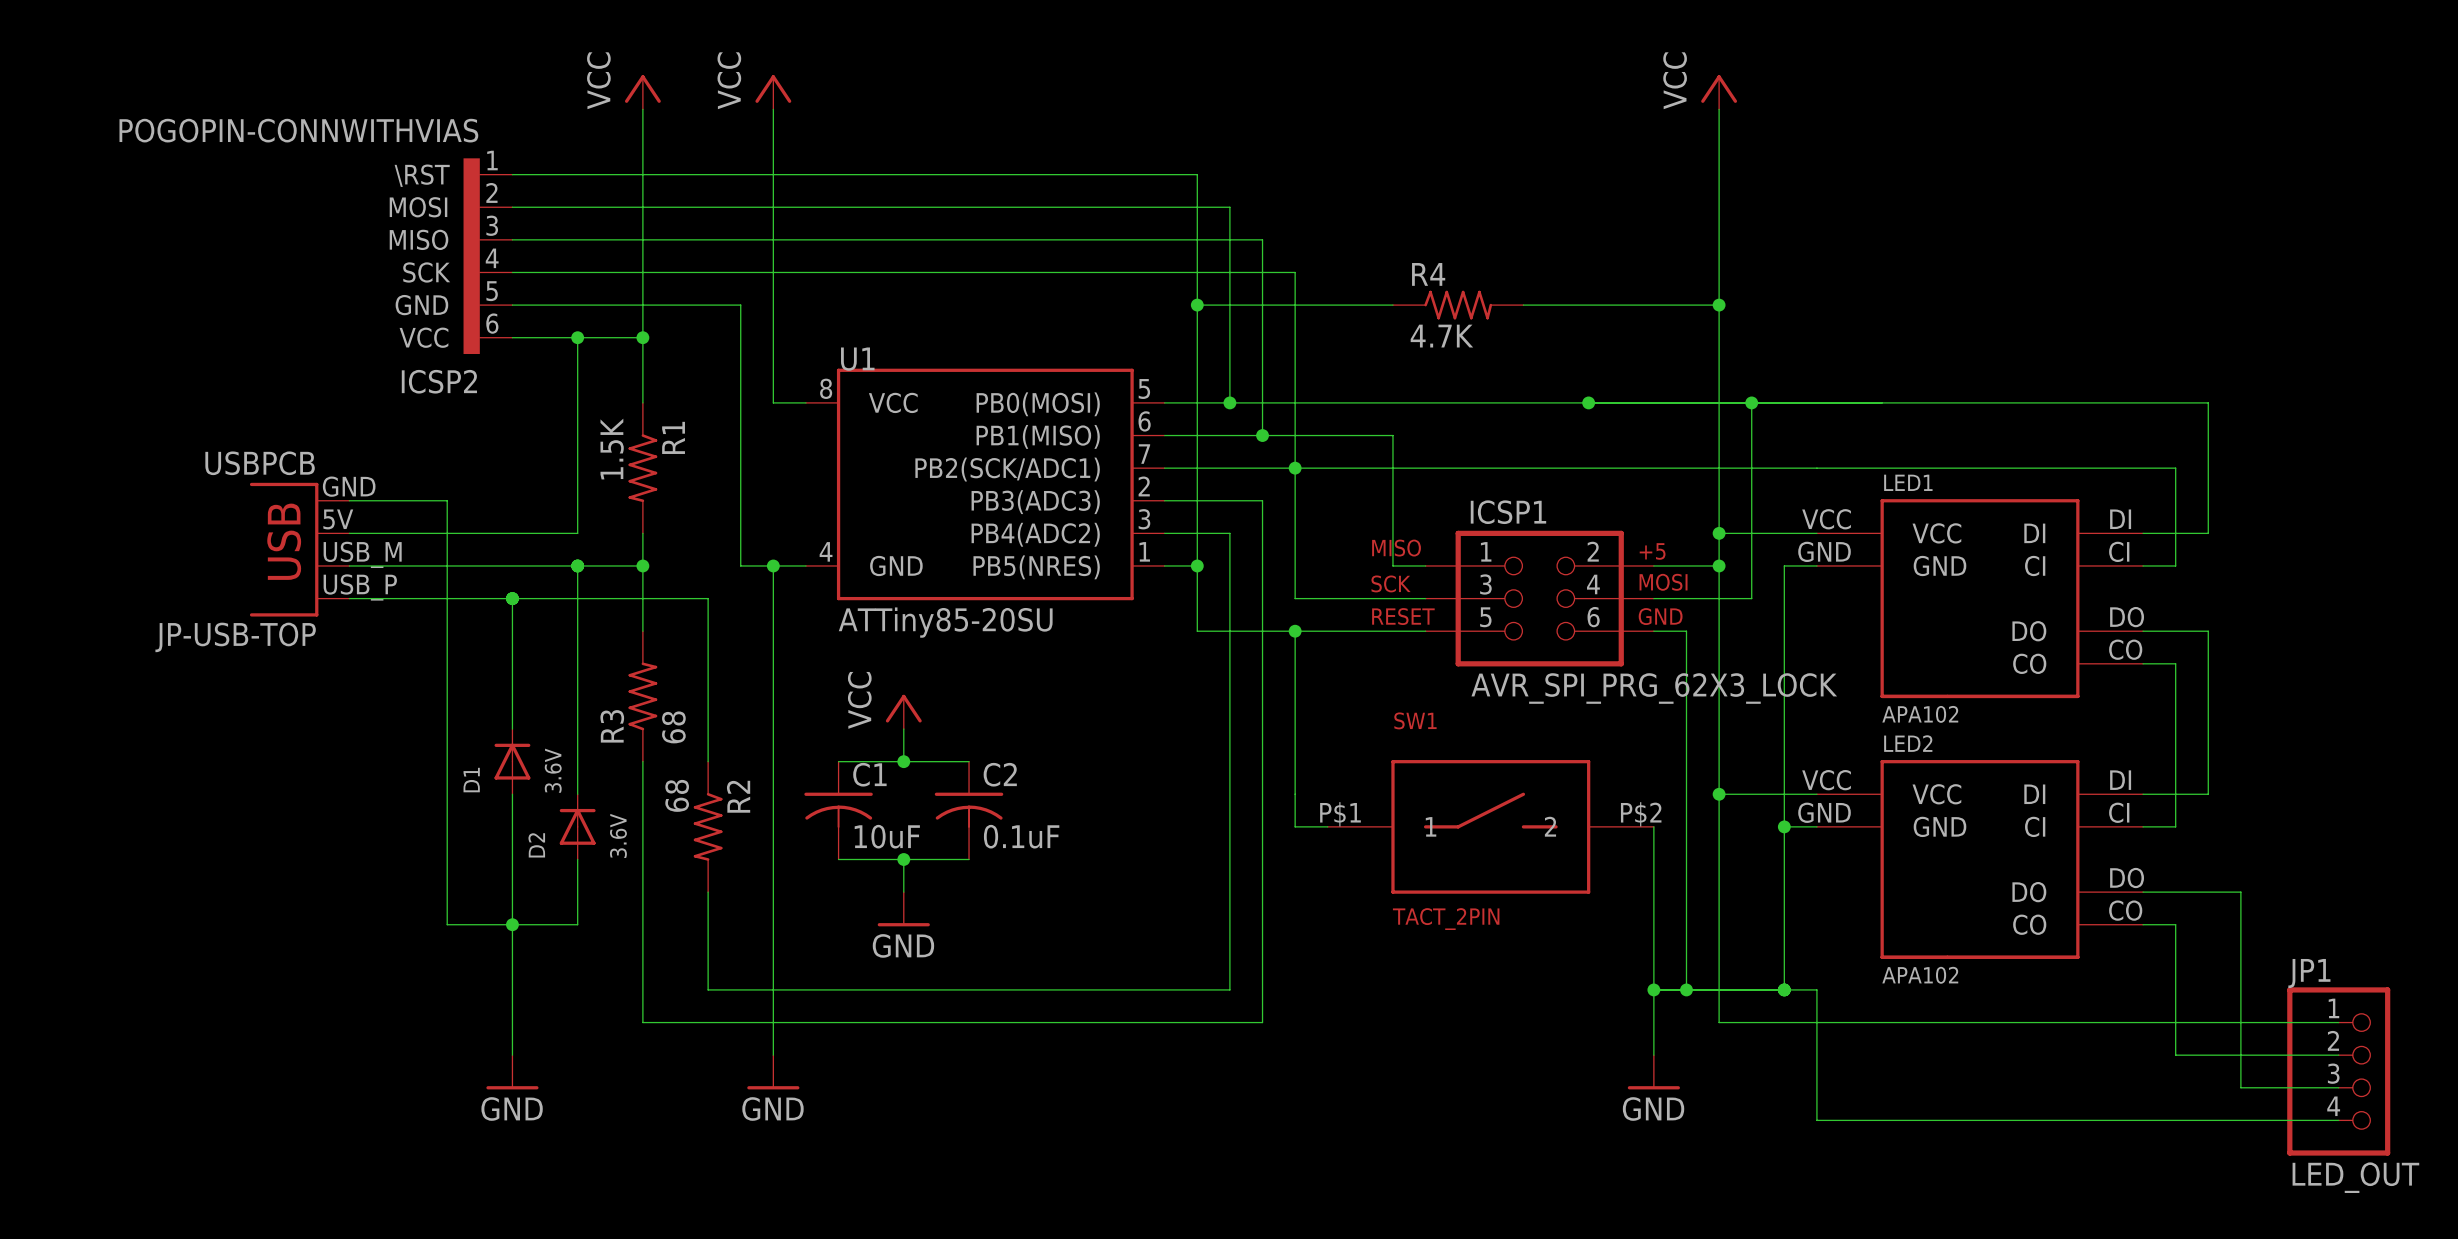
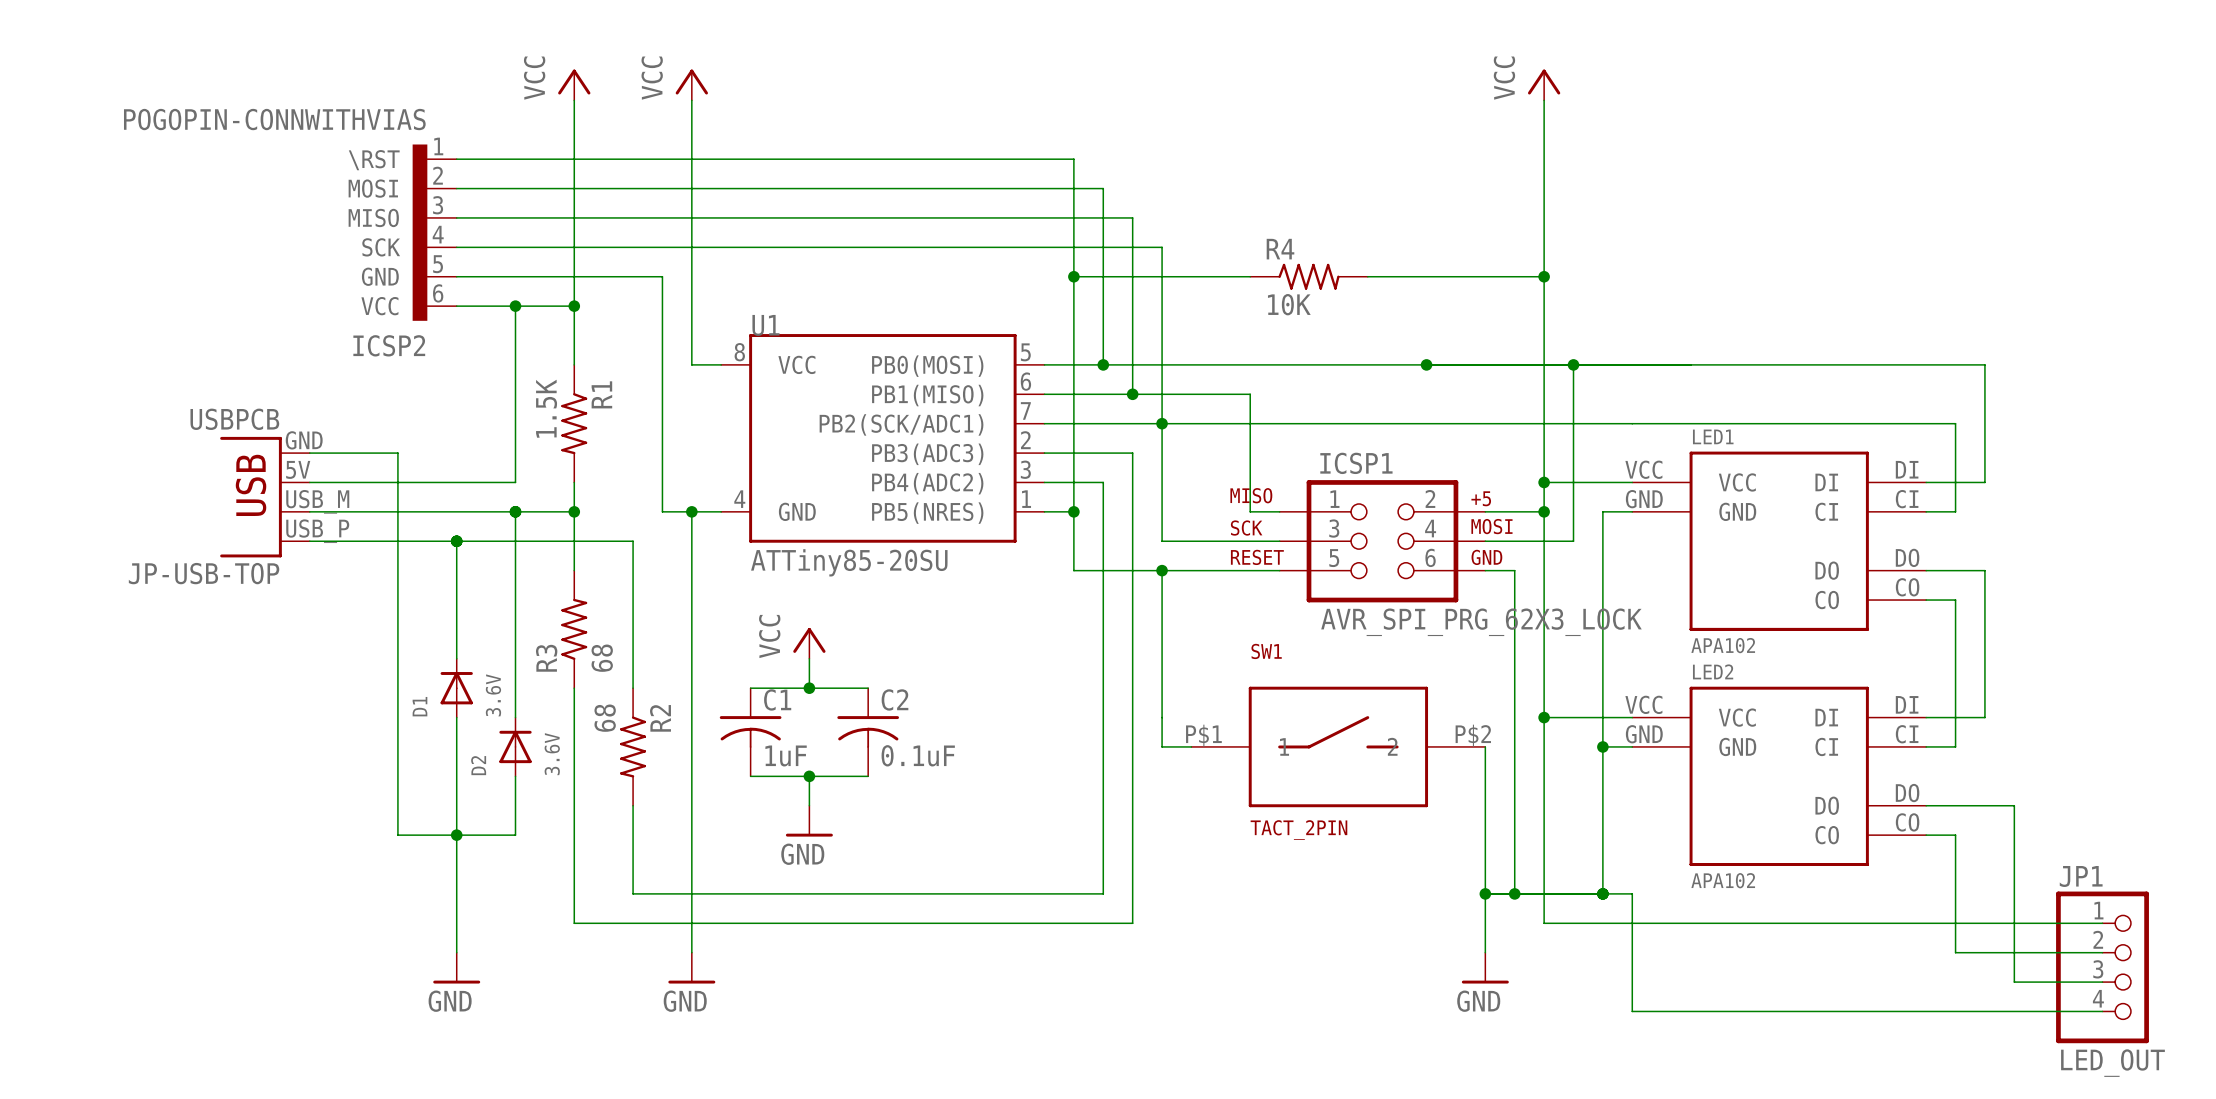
R4 value: 4.7K (1441, 336) -> 10K (1289, 304)
C1 value: 10uF (887, 836) -> 1uF (786, 755)

